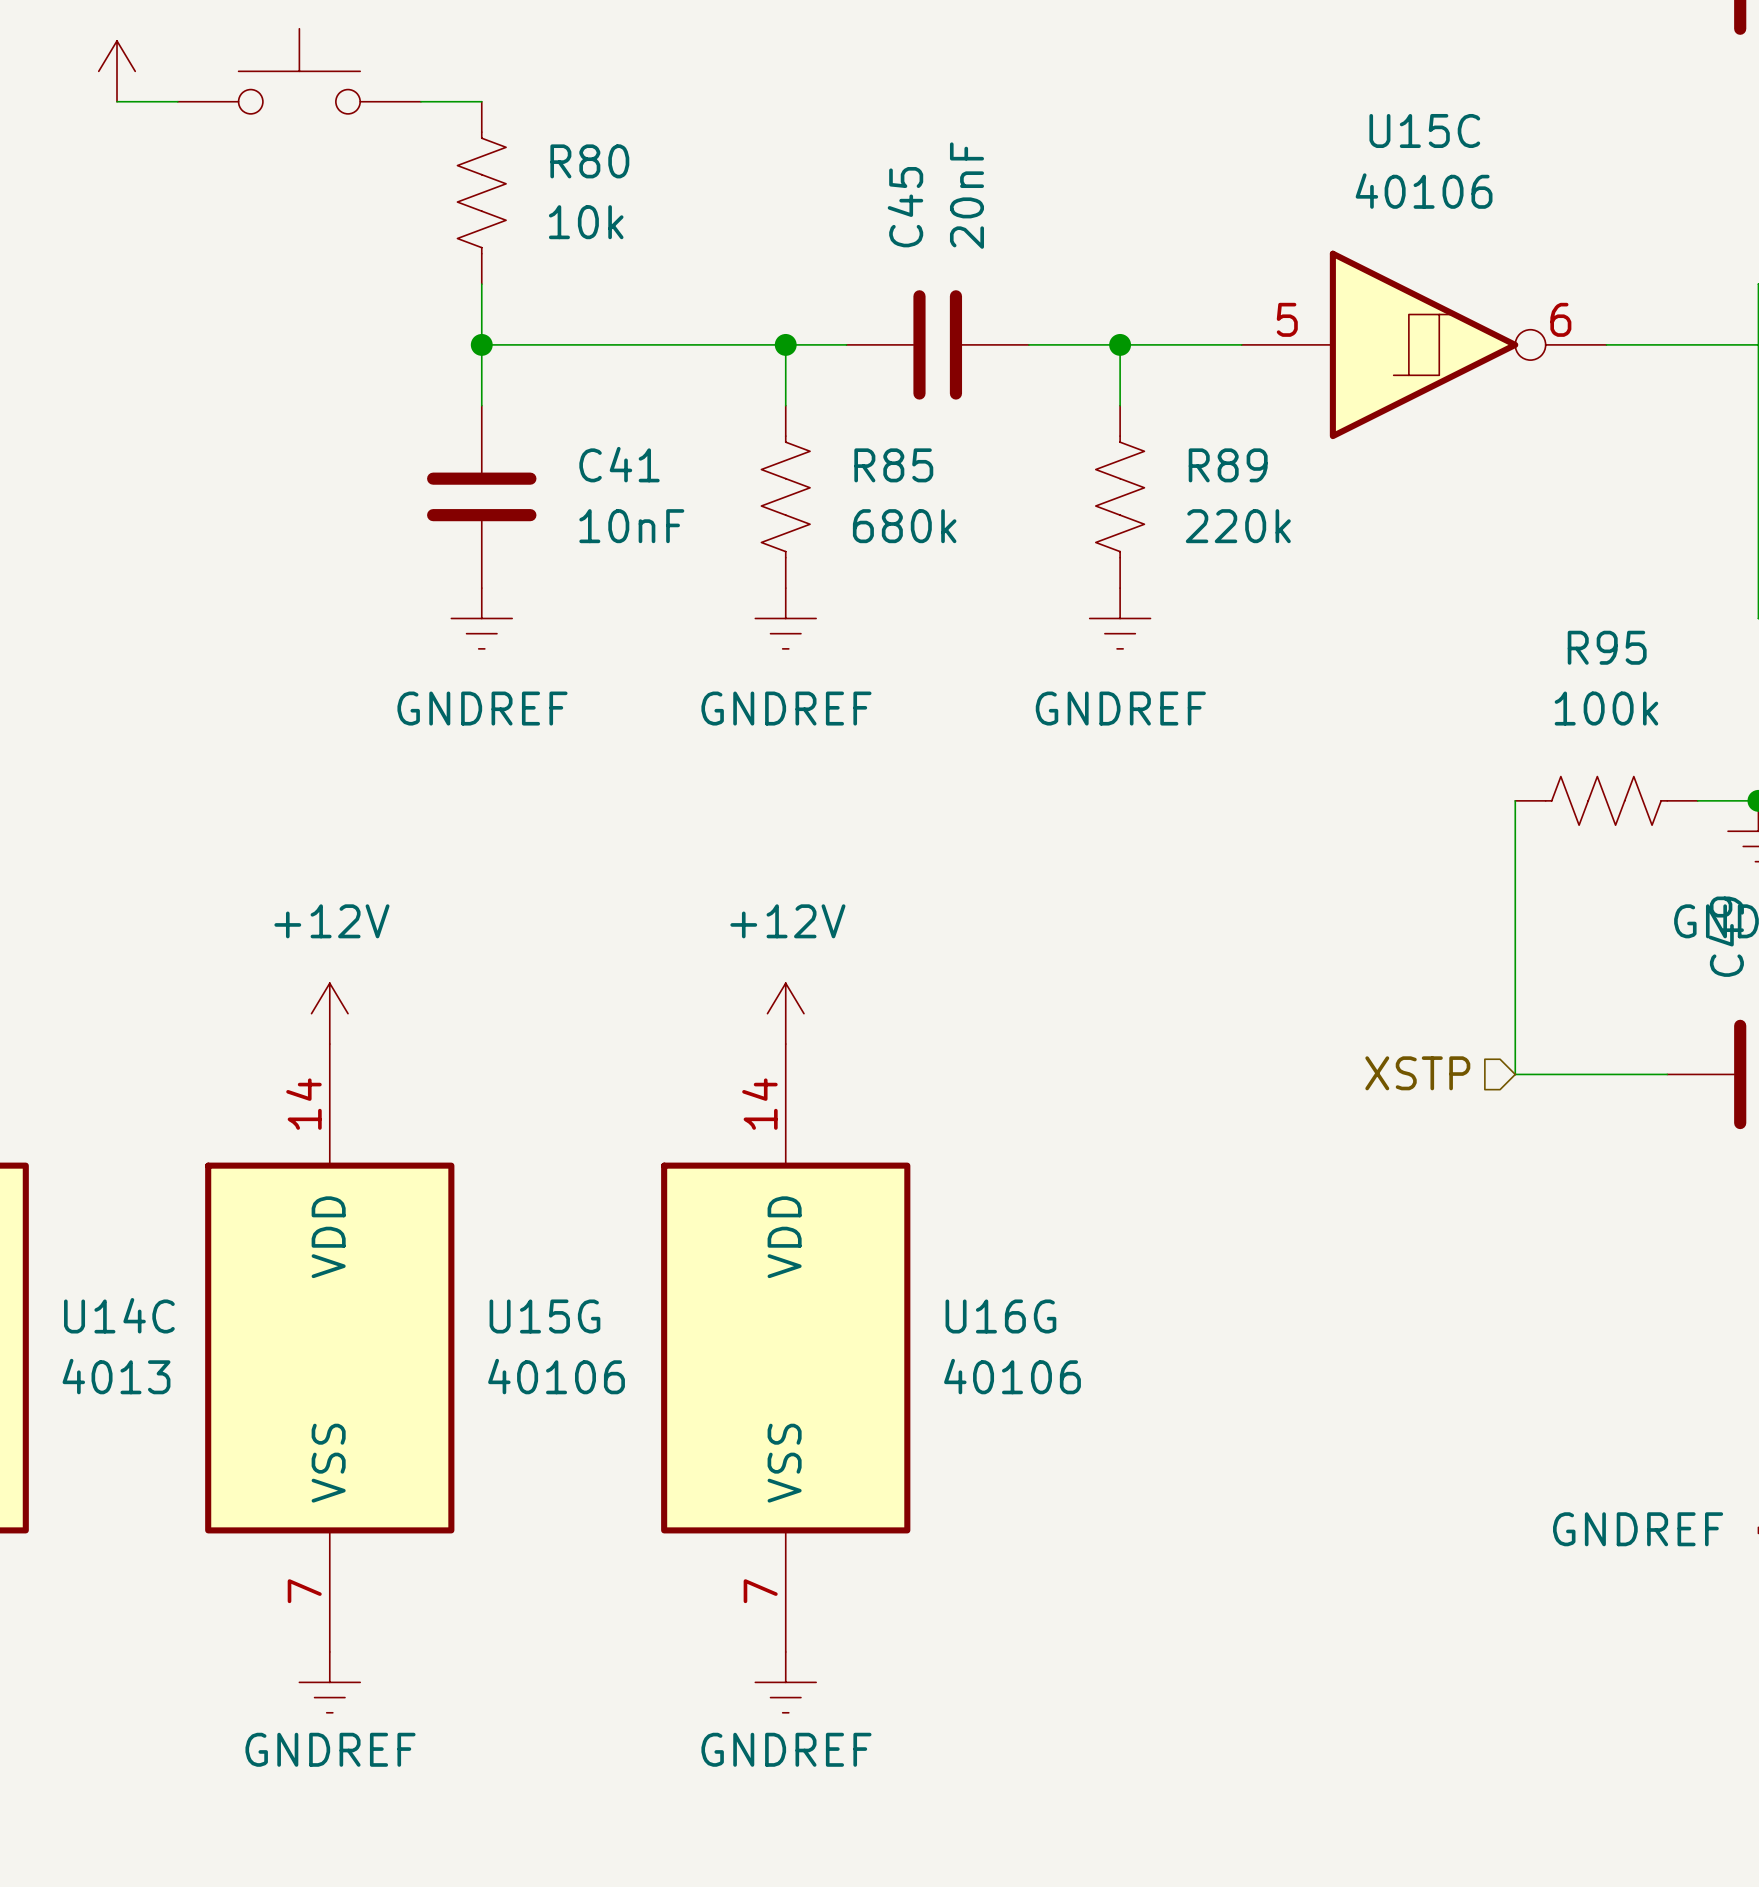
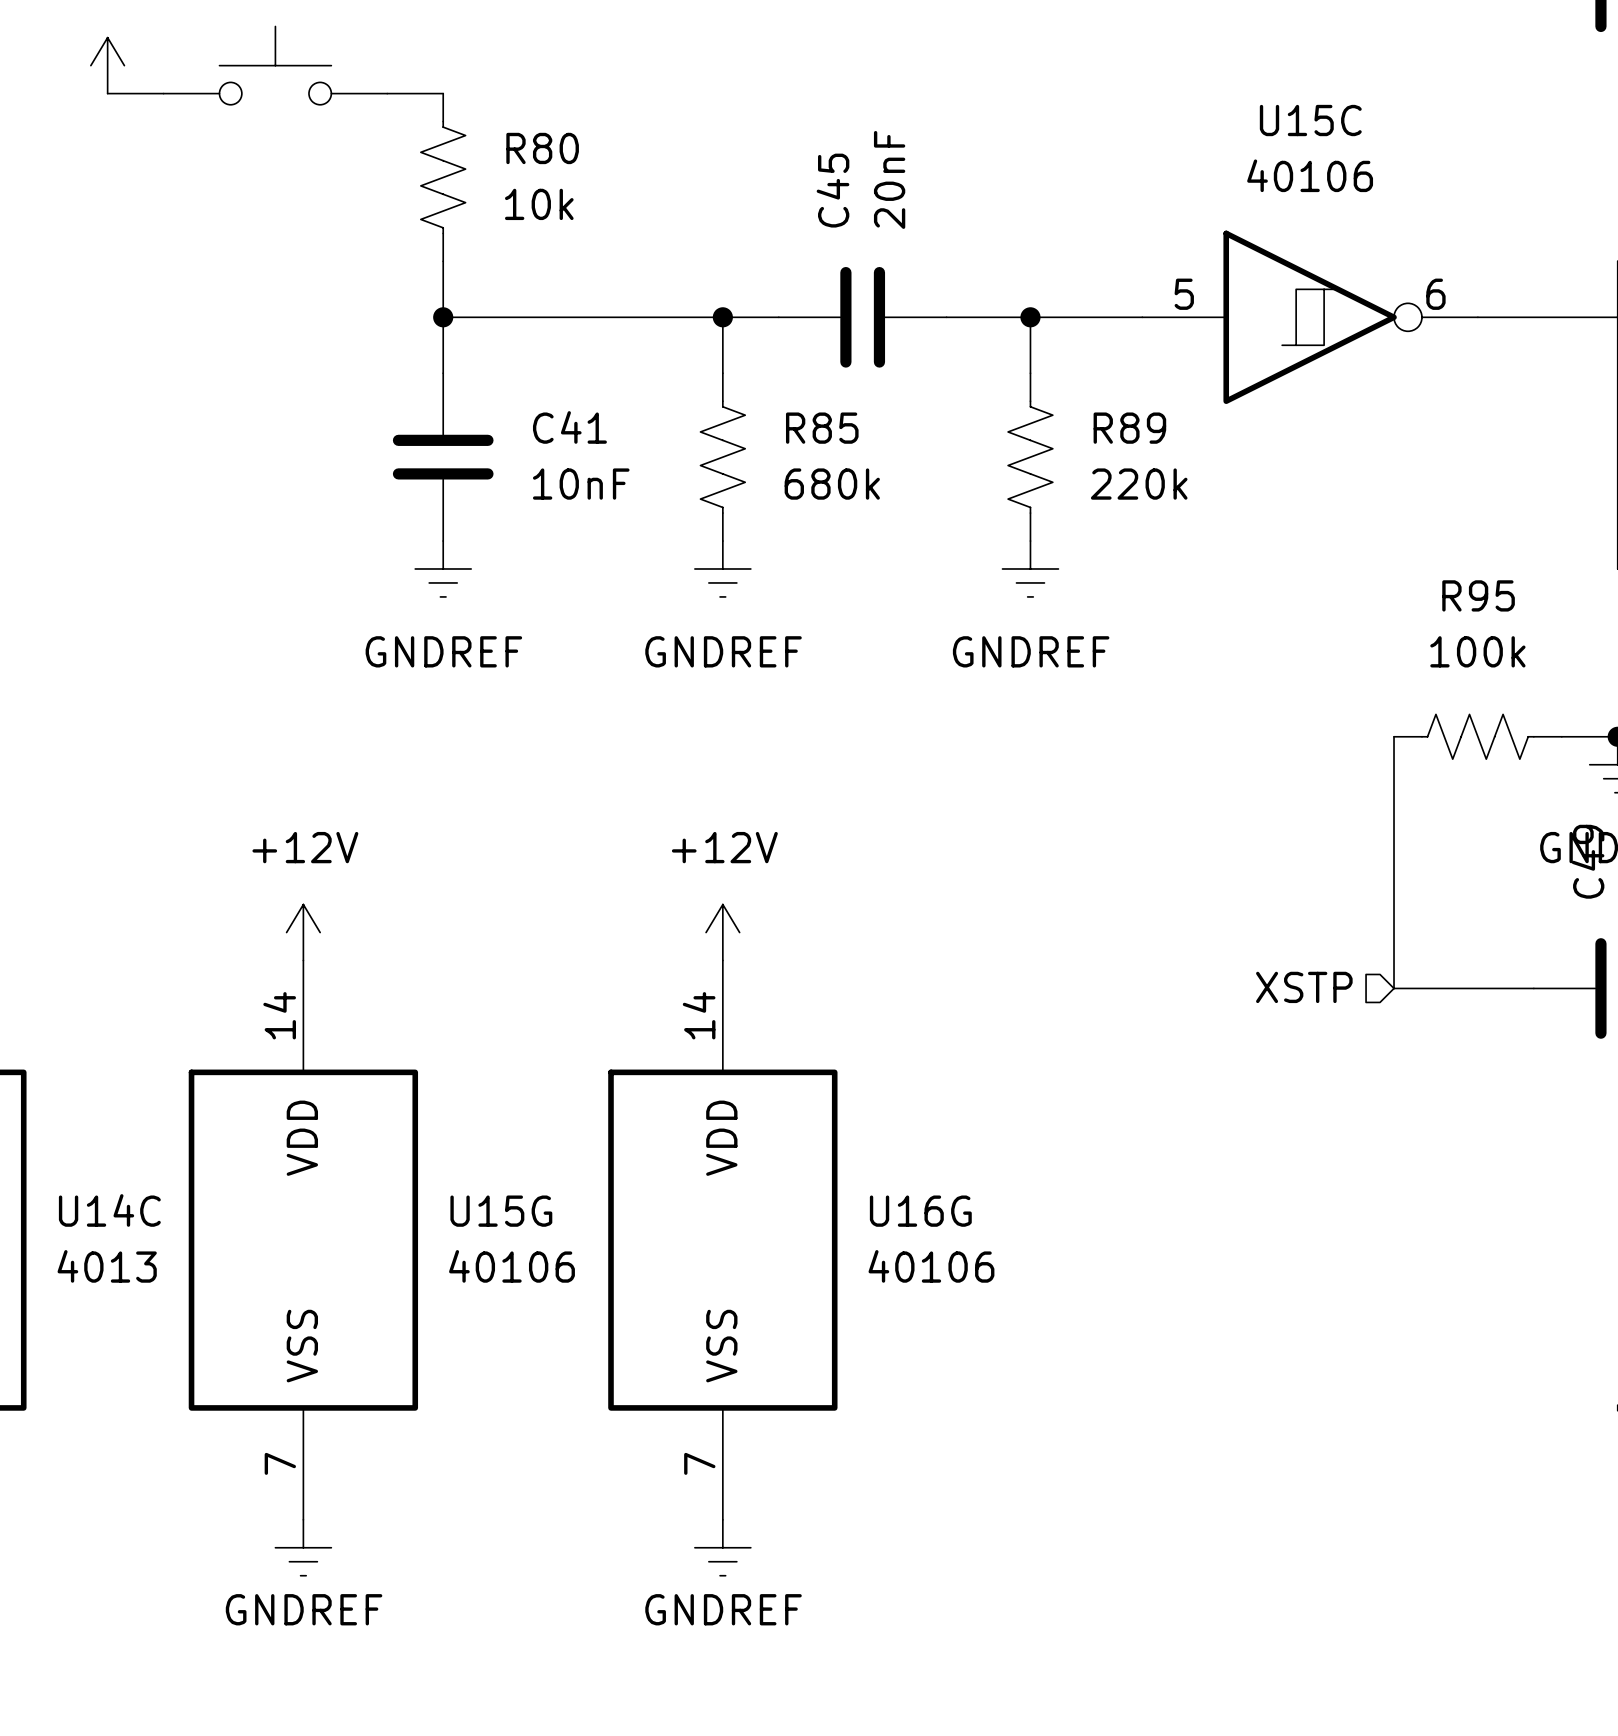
power symbol text: GNDREF (1638, 1529) -> none

